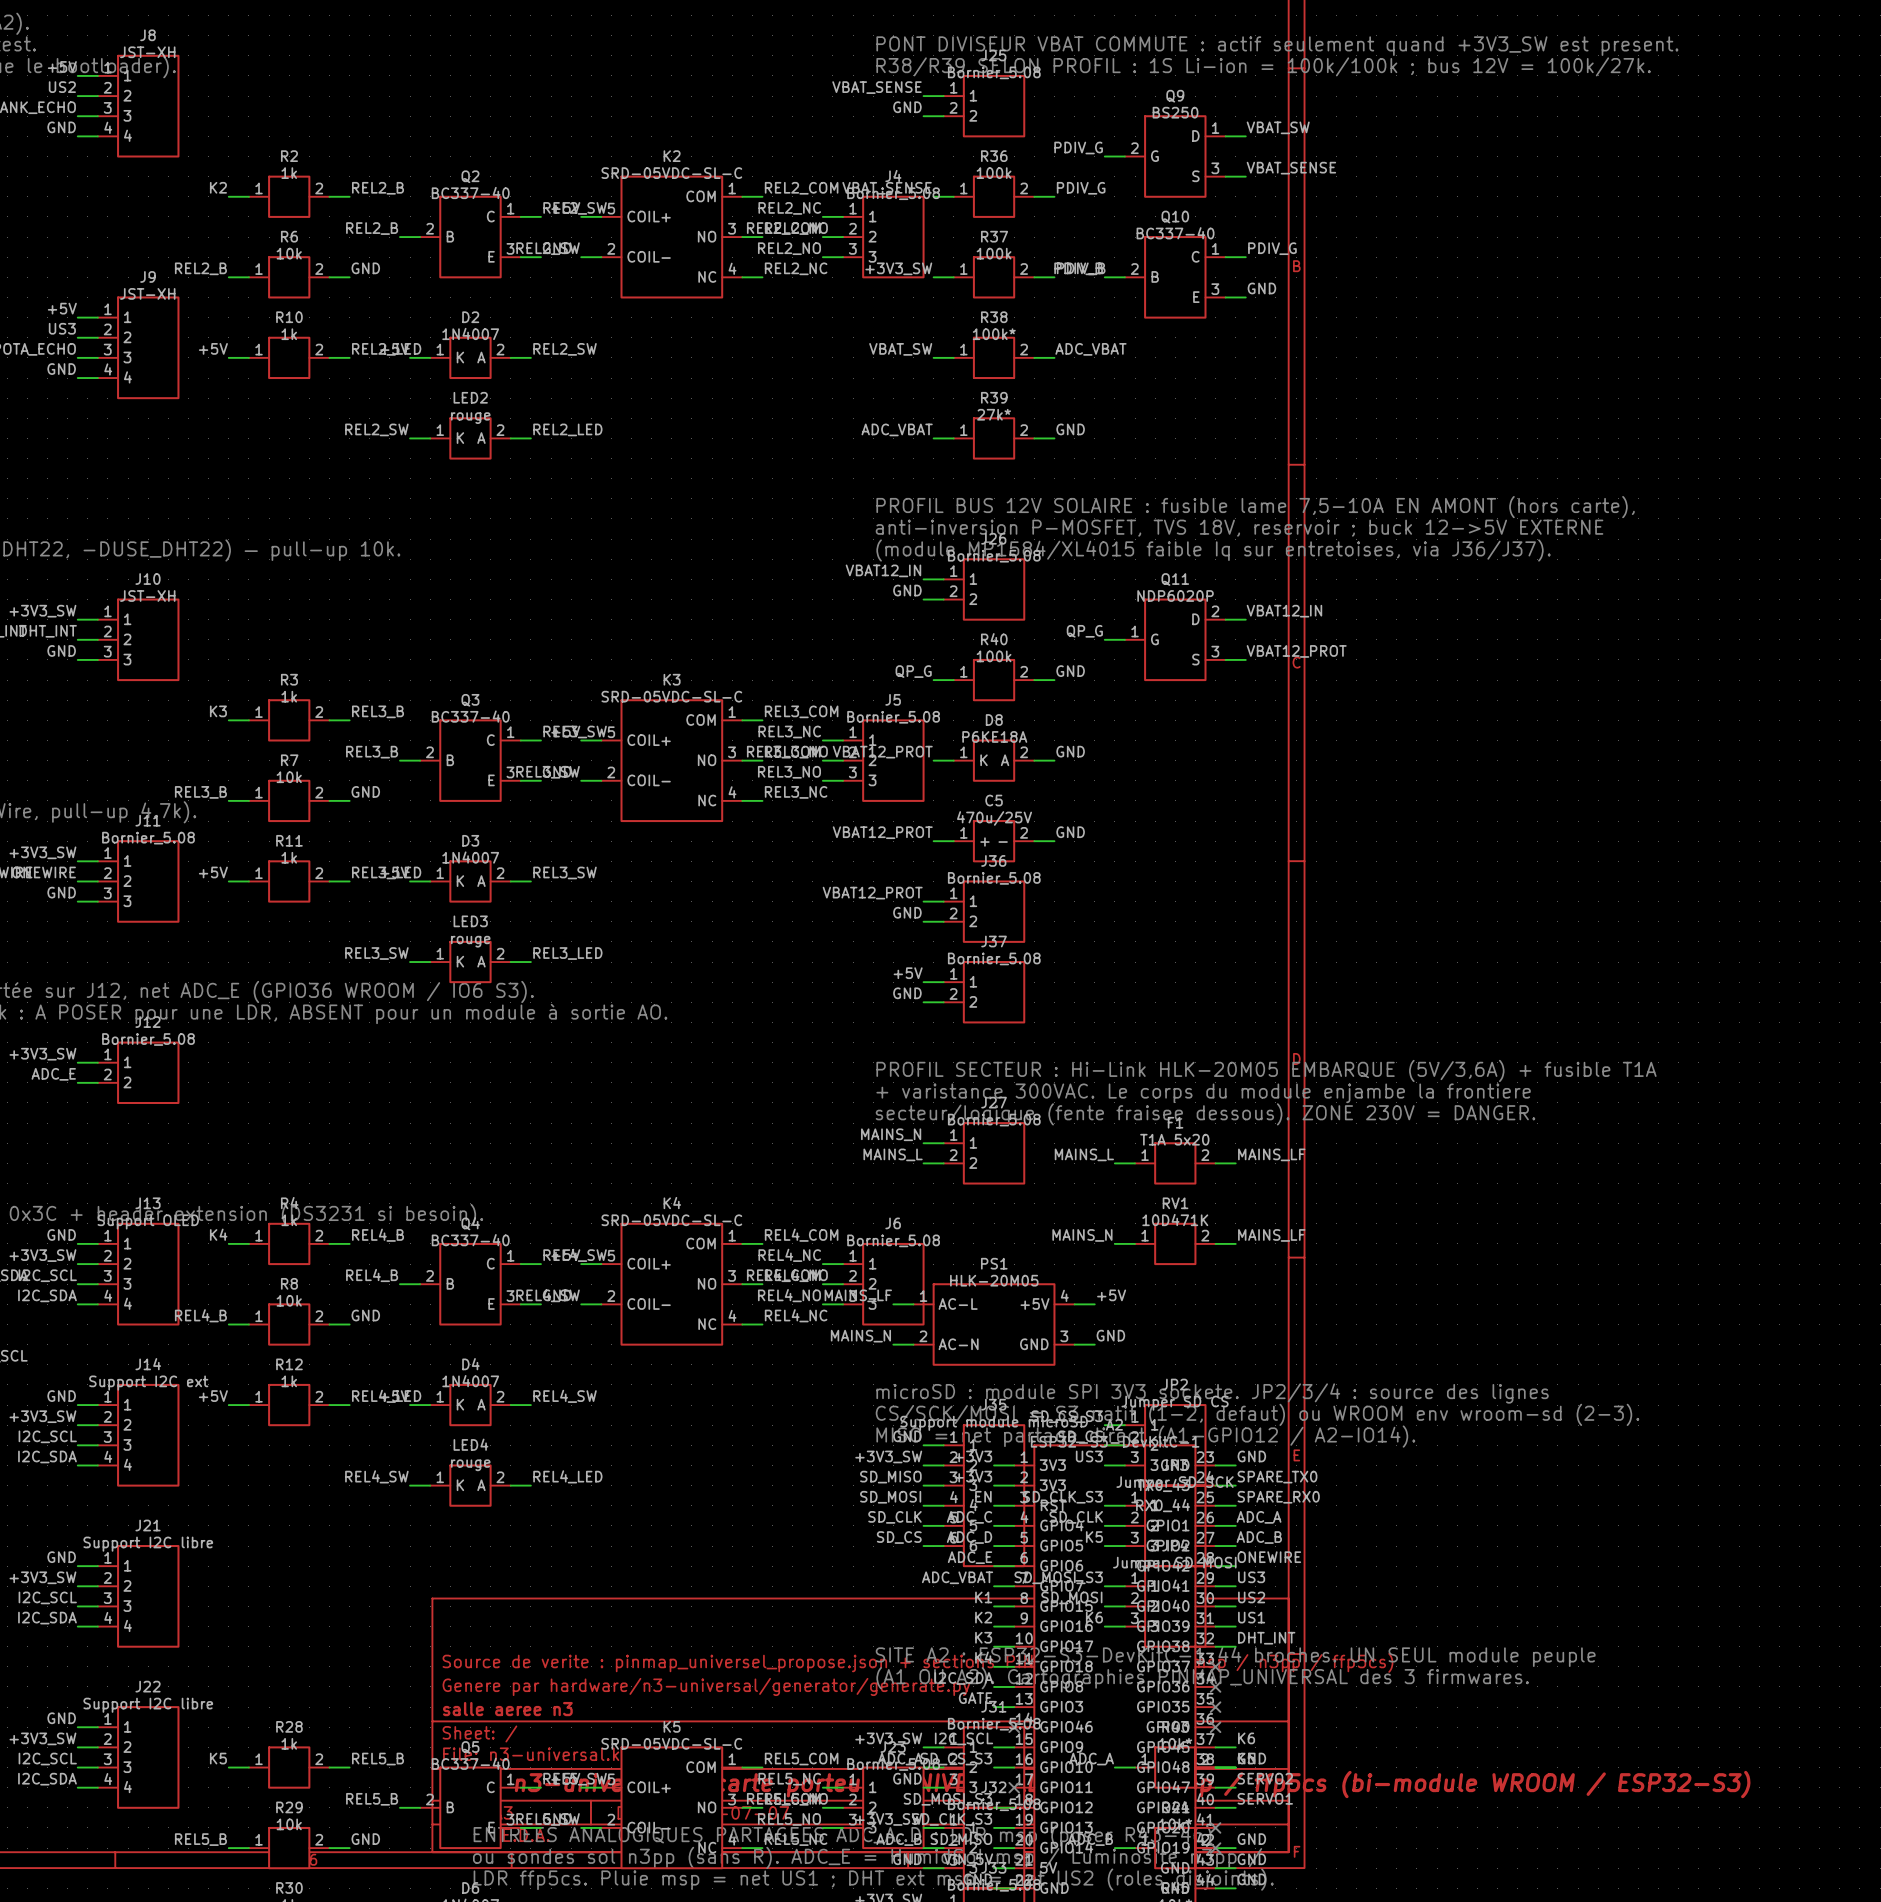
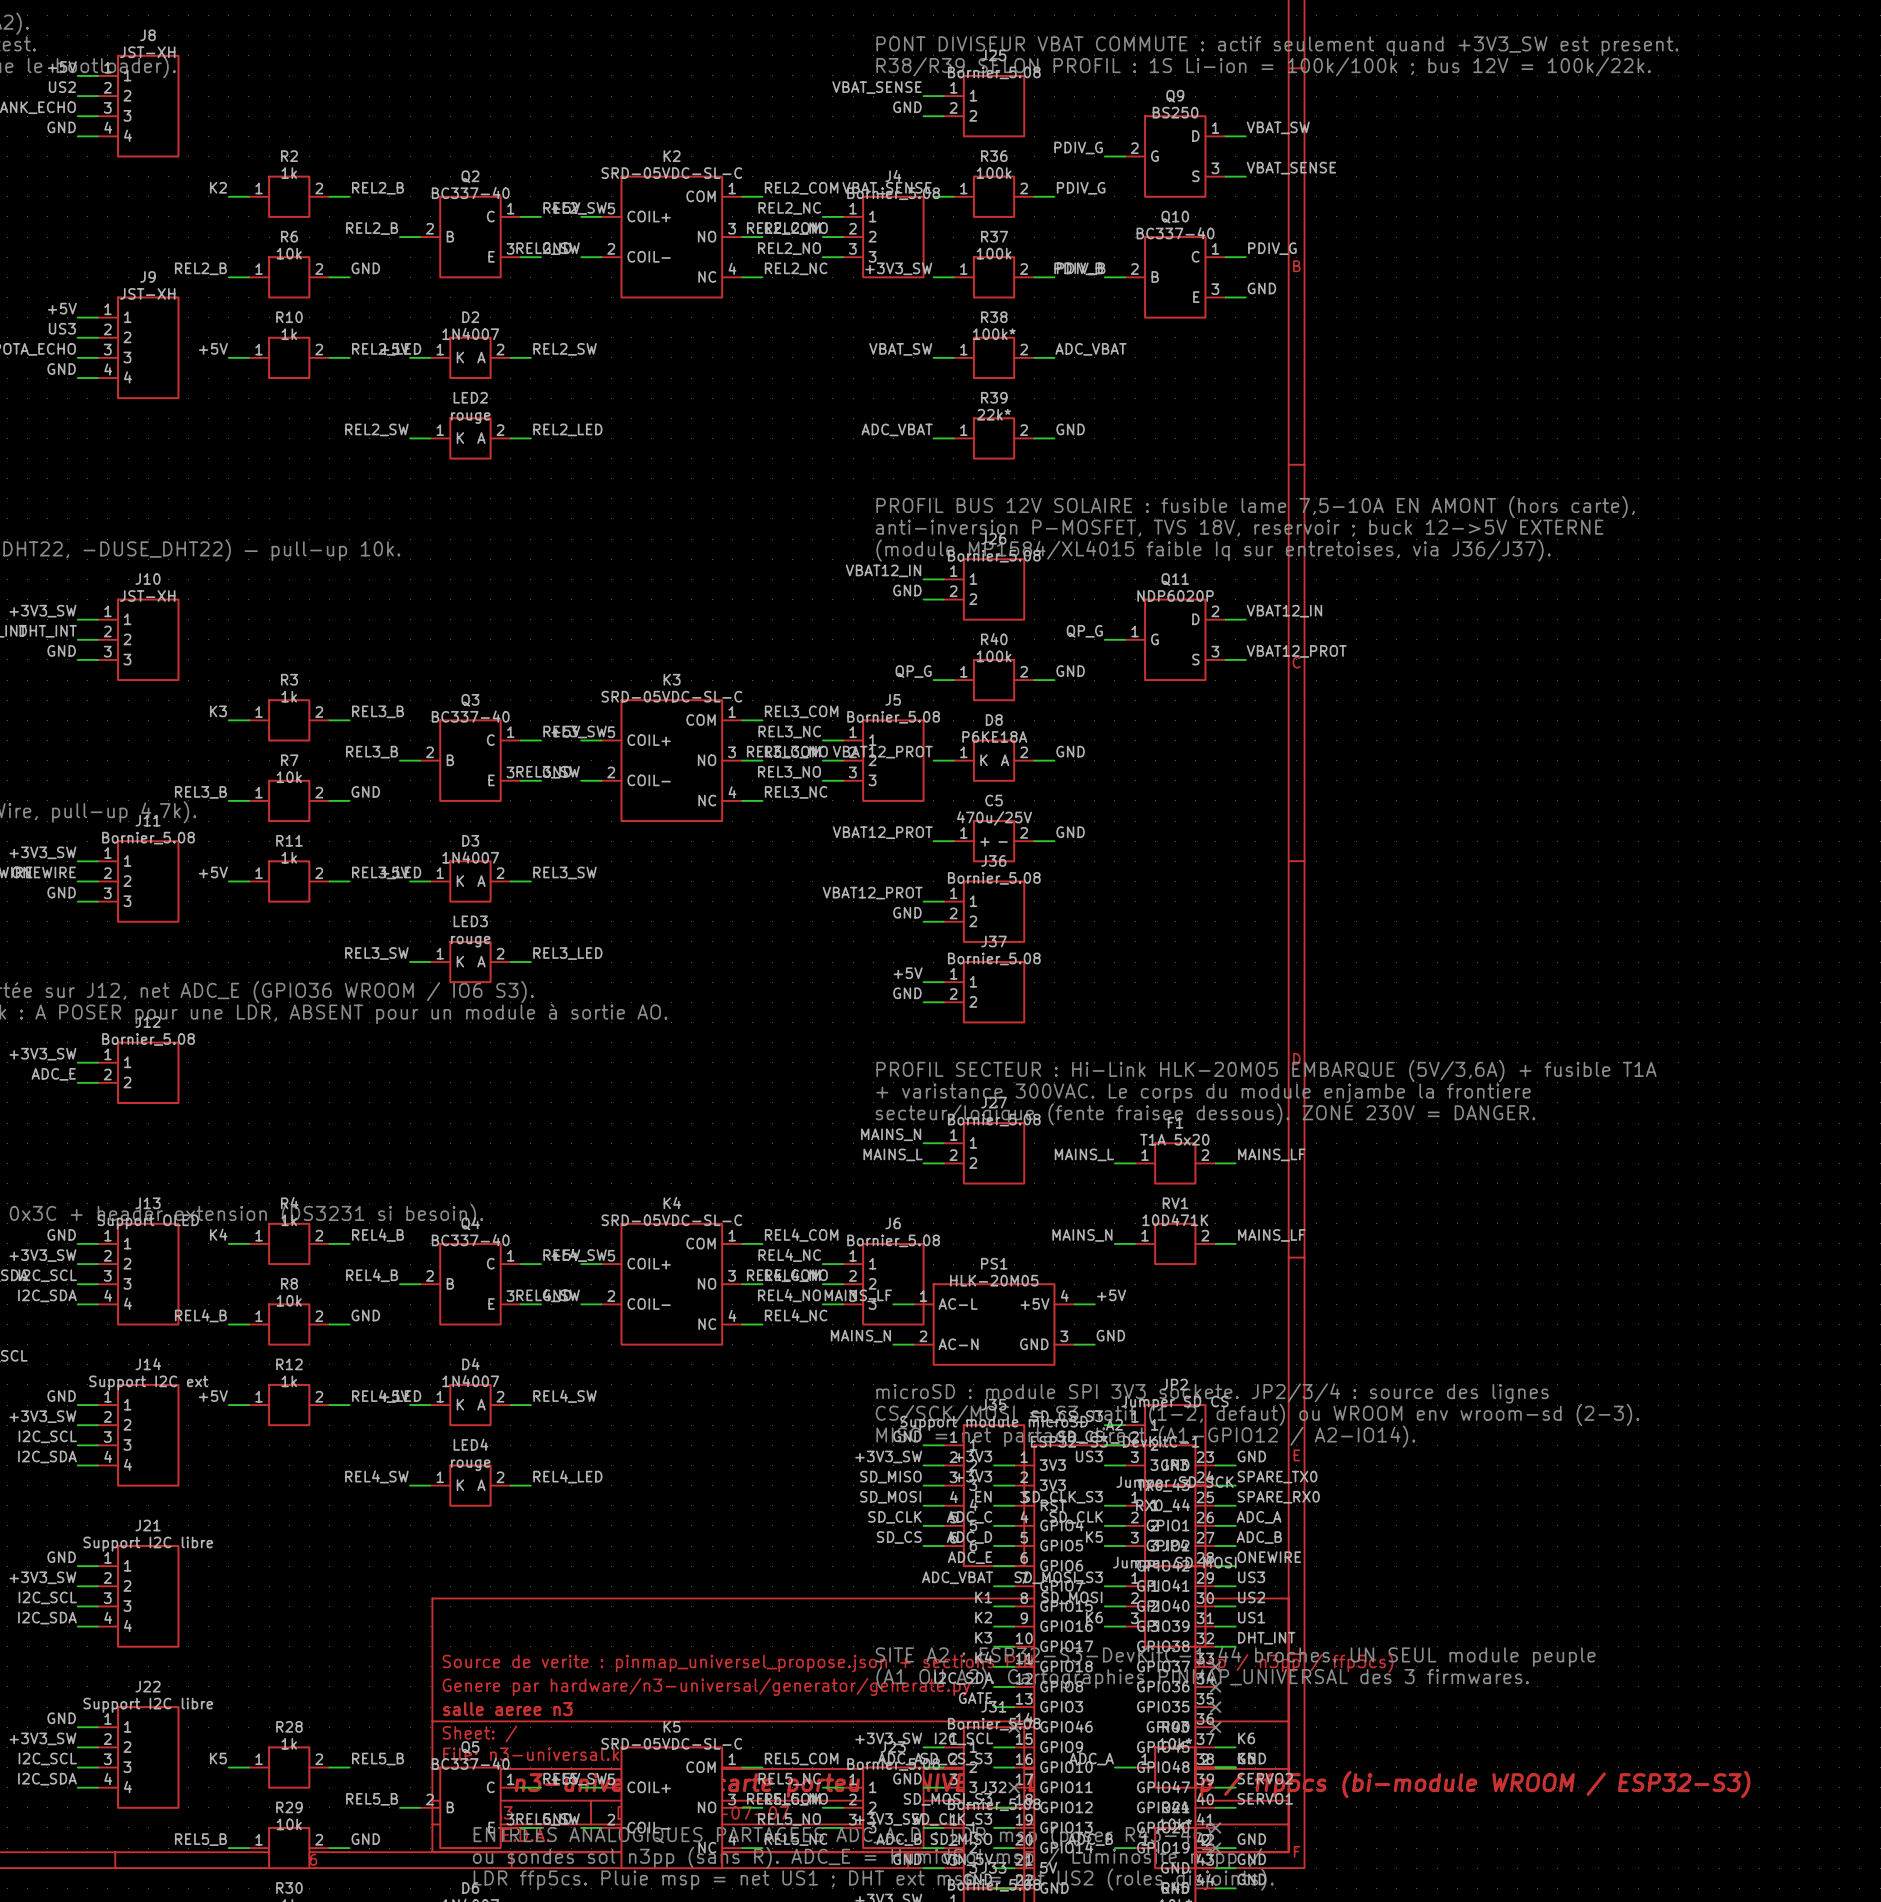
text: R38/R39 SELON PROFIL : 1S Li-ion = 100k/100k ; bus 12V = 100k/27k. (1263, 66) -> R38/R39 SELON PROFIL : 1S Li-ion = 100k/100k ; bus 12V = 100k/22k. (1263, 66)
R39 value: 27k* (994, 414) -> 22k* (994, 414)

